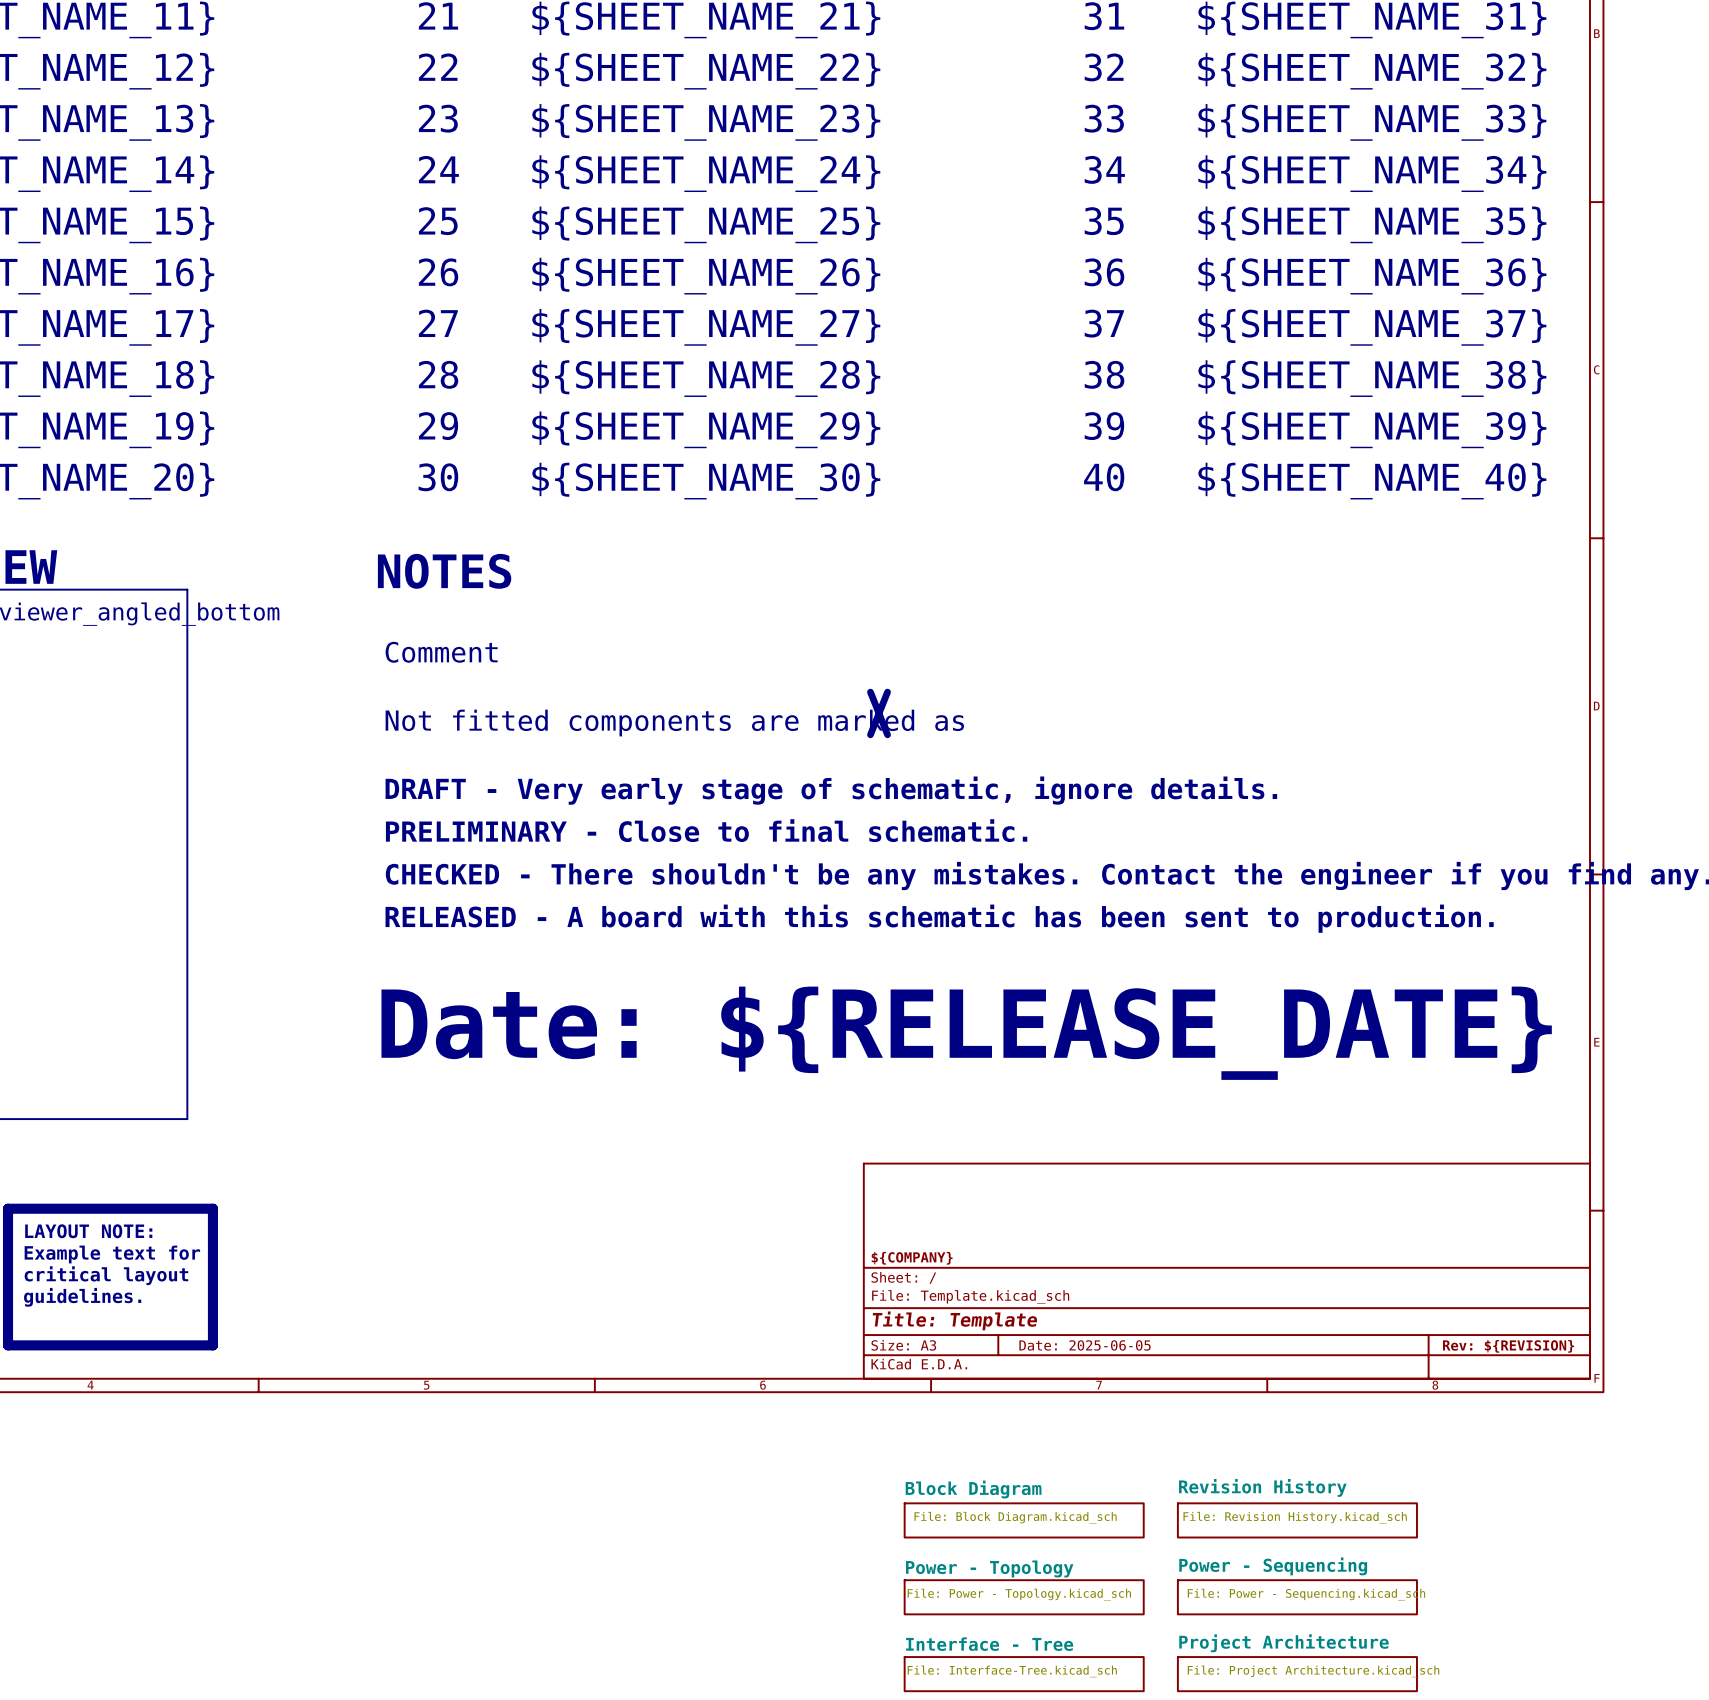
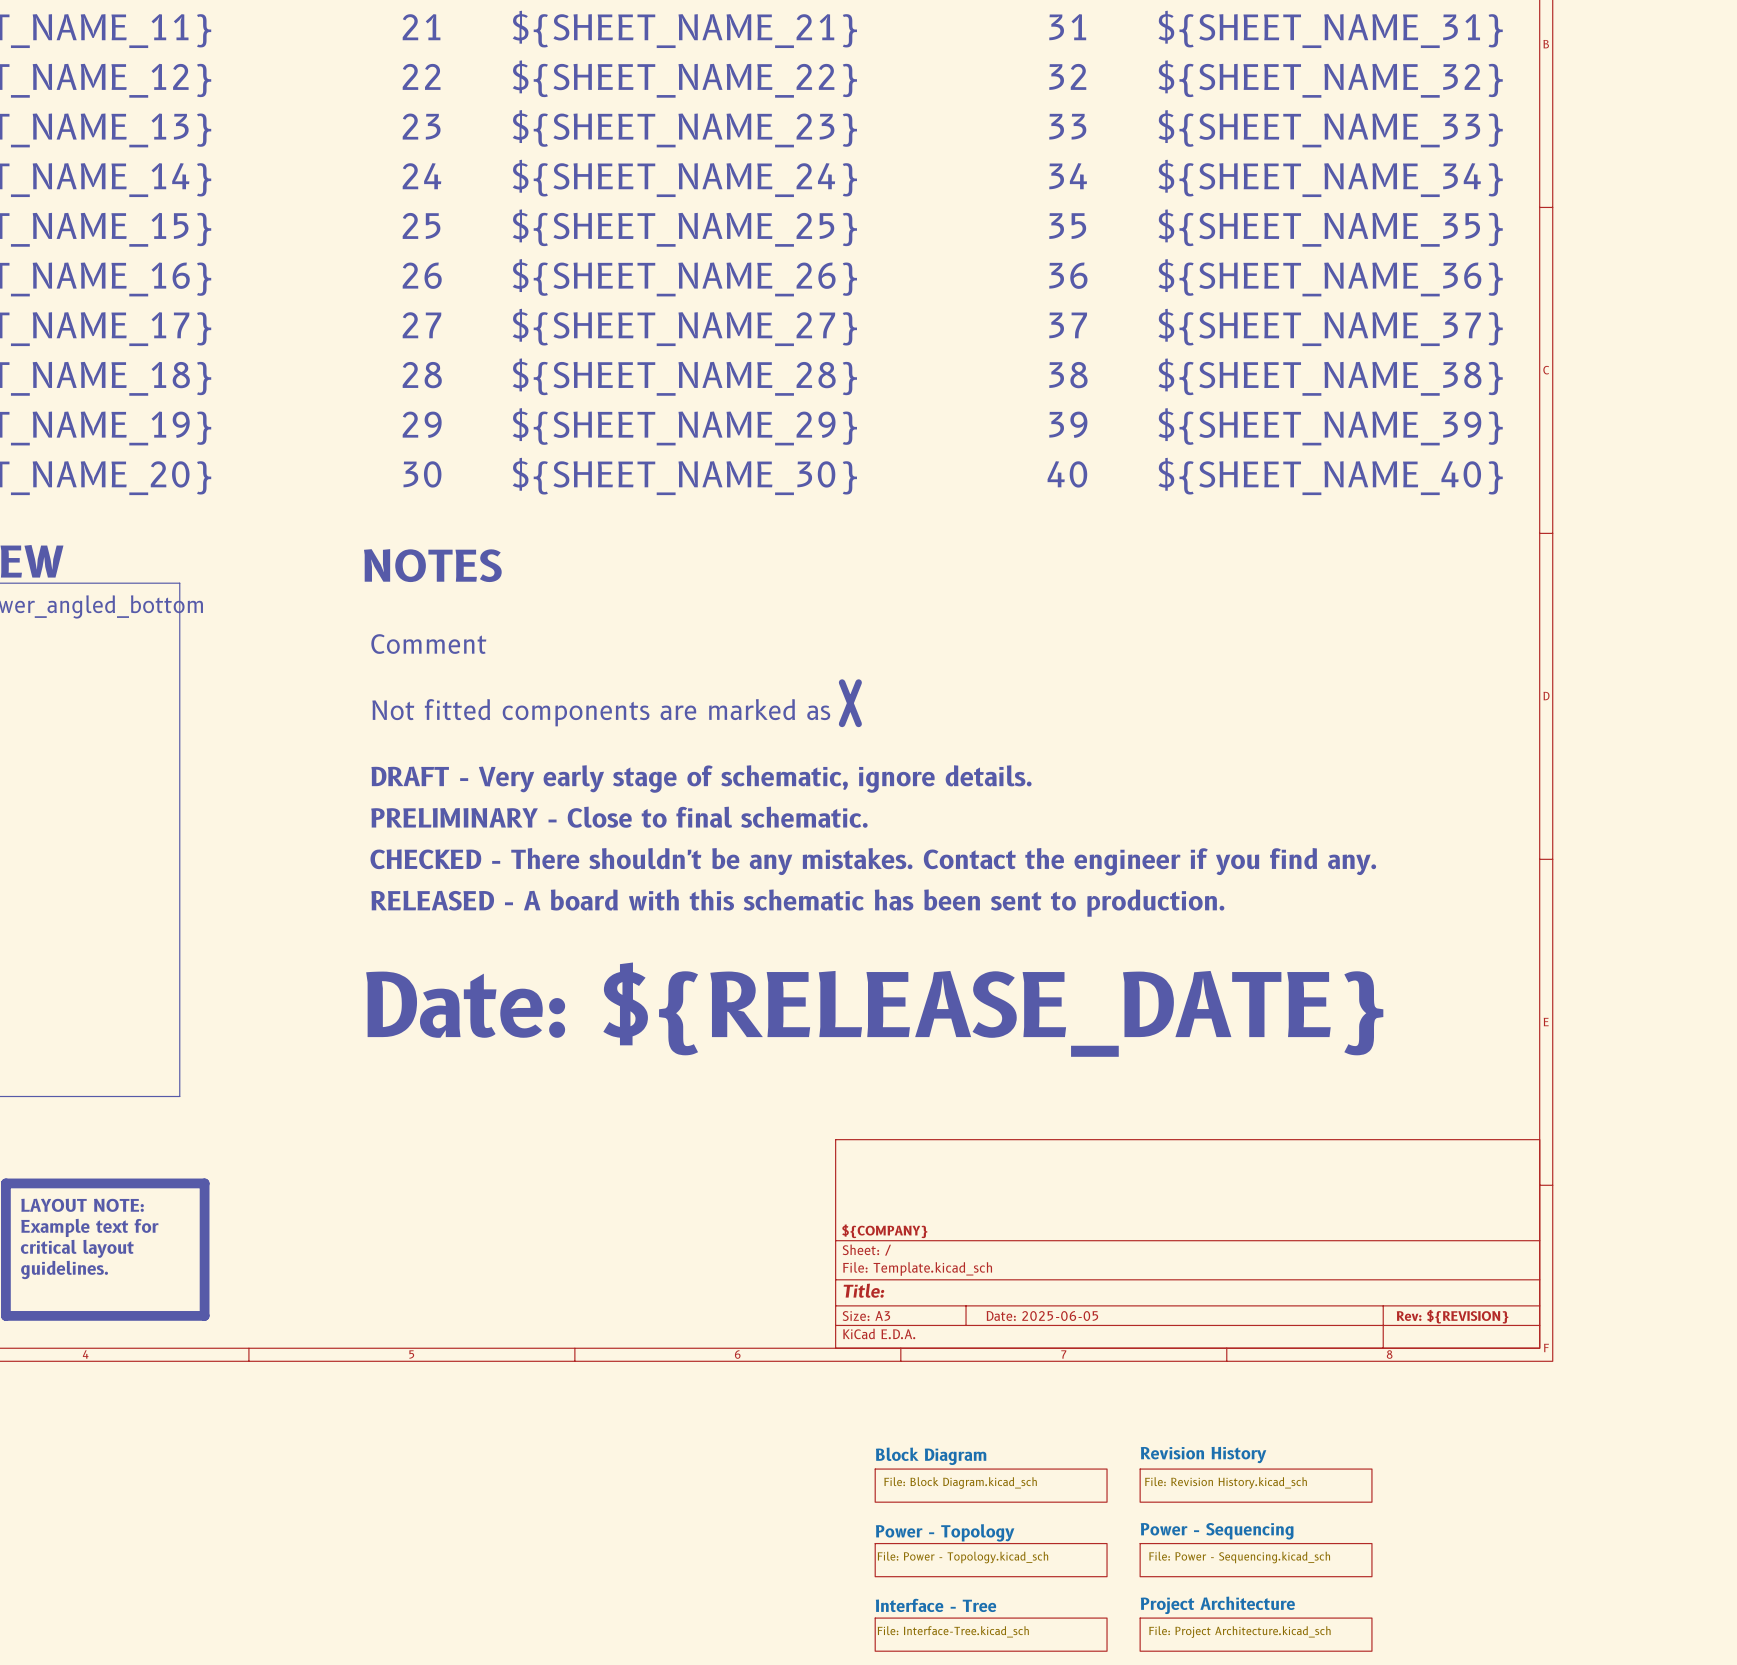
title block: Title: Template (955, 1320) -> Title: (863, 1290)

